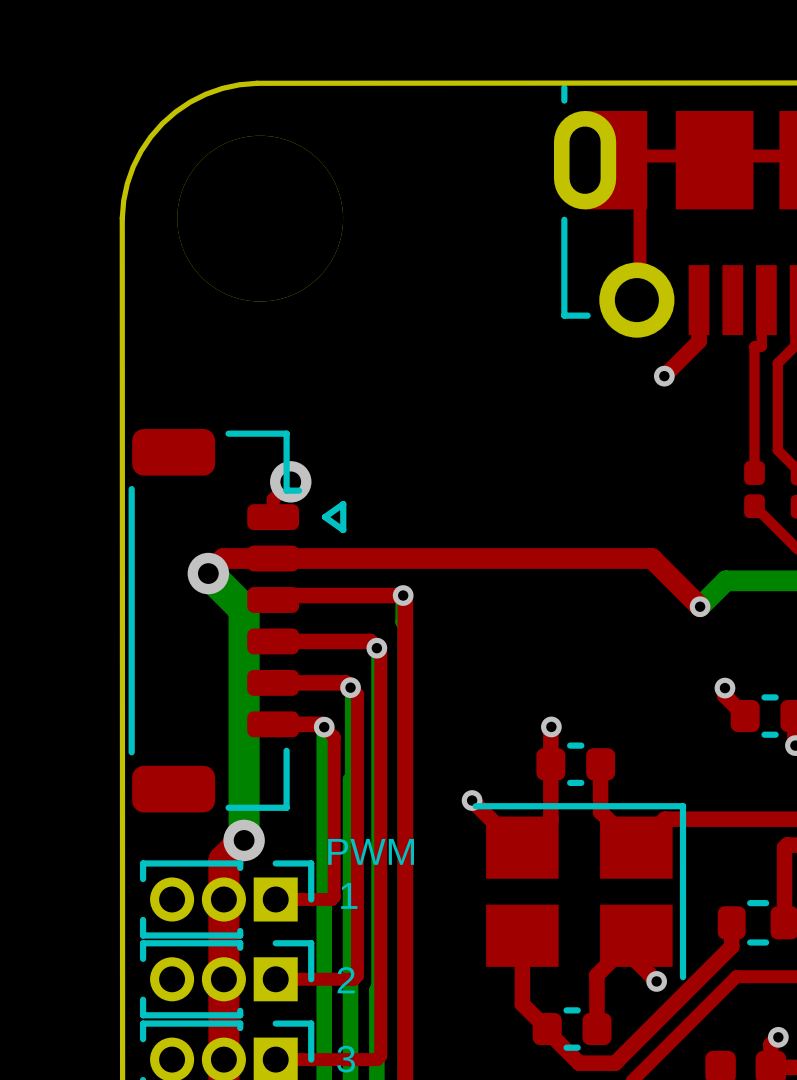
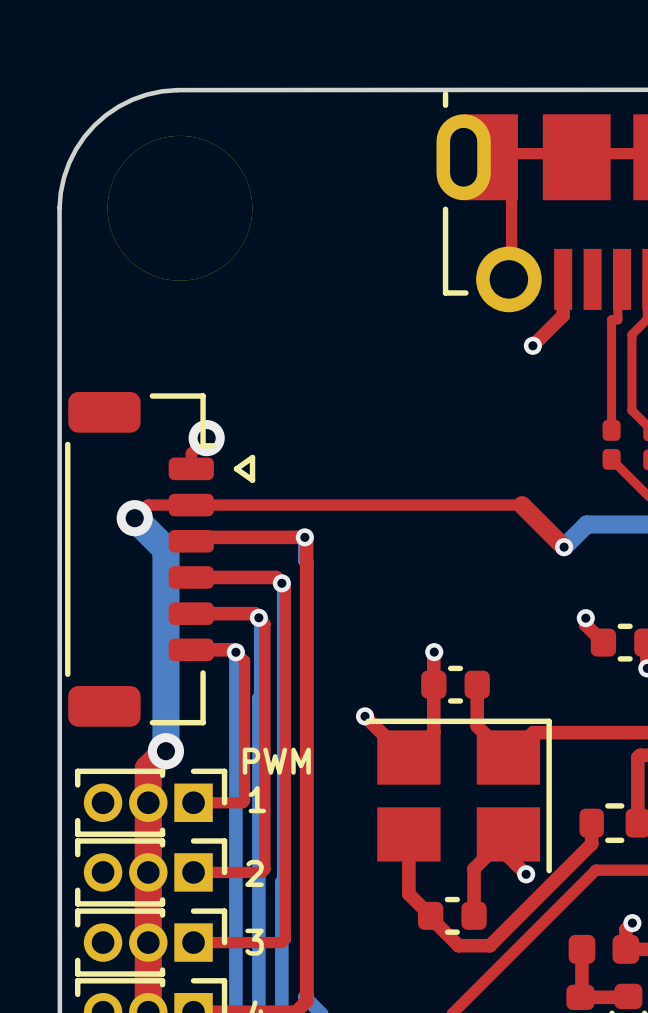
top track width: thick (651, 558) (223, 558) (208, 573) -> thin (522, 505) (147, 505) (134, 518)

